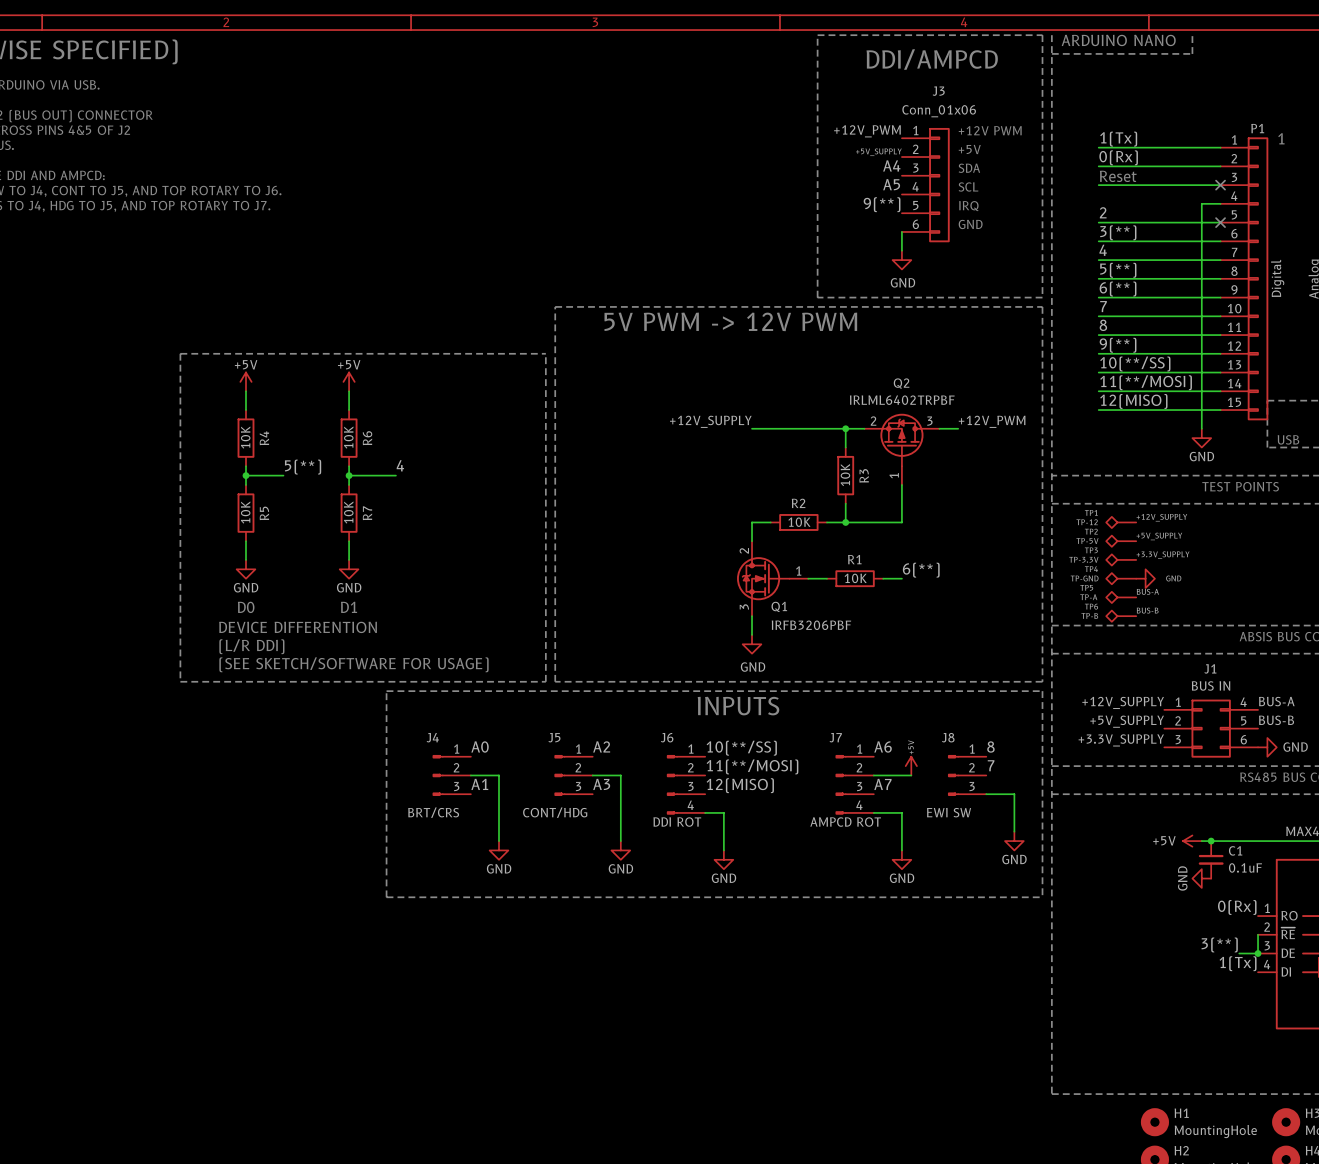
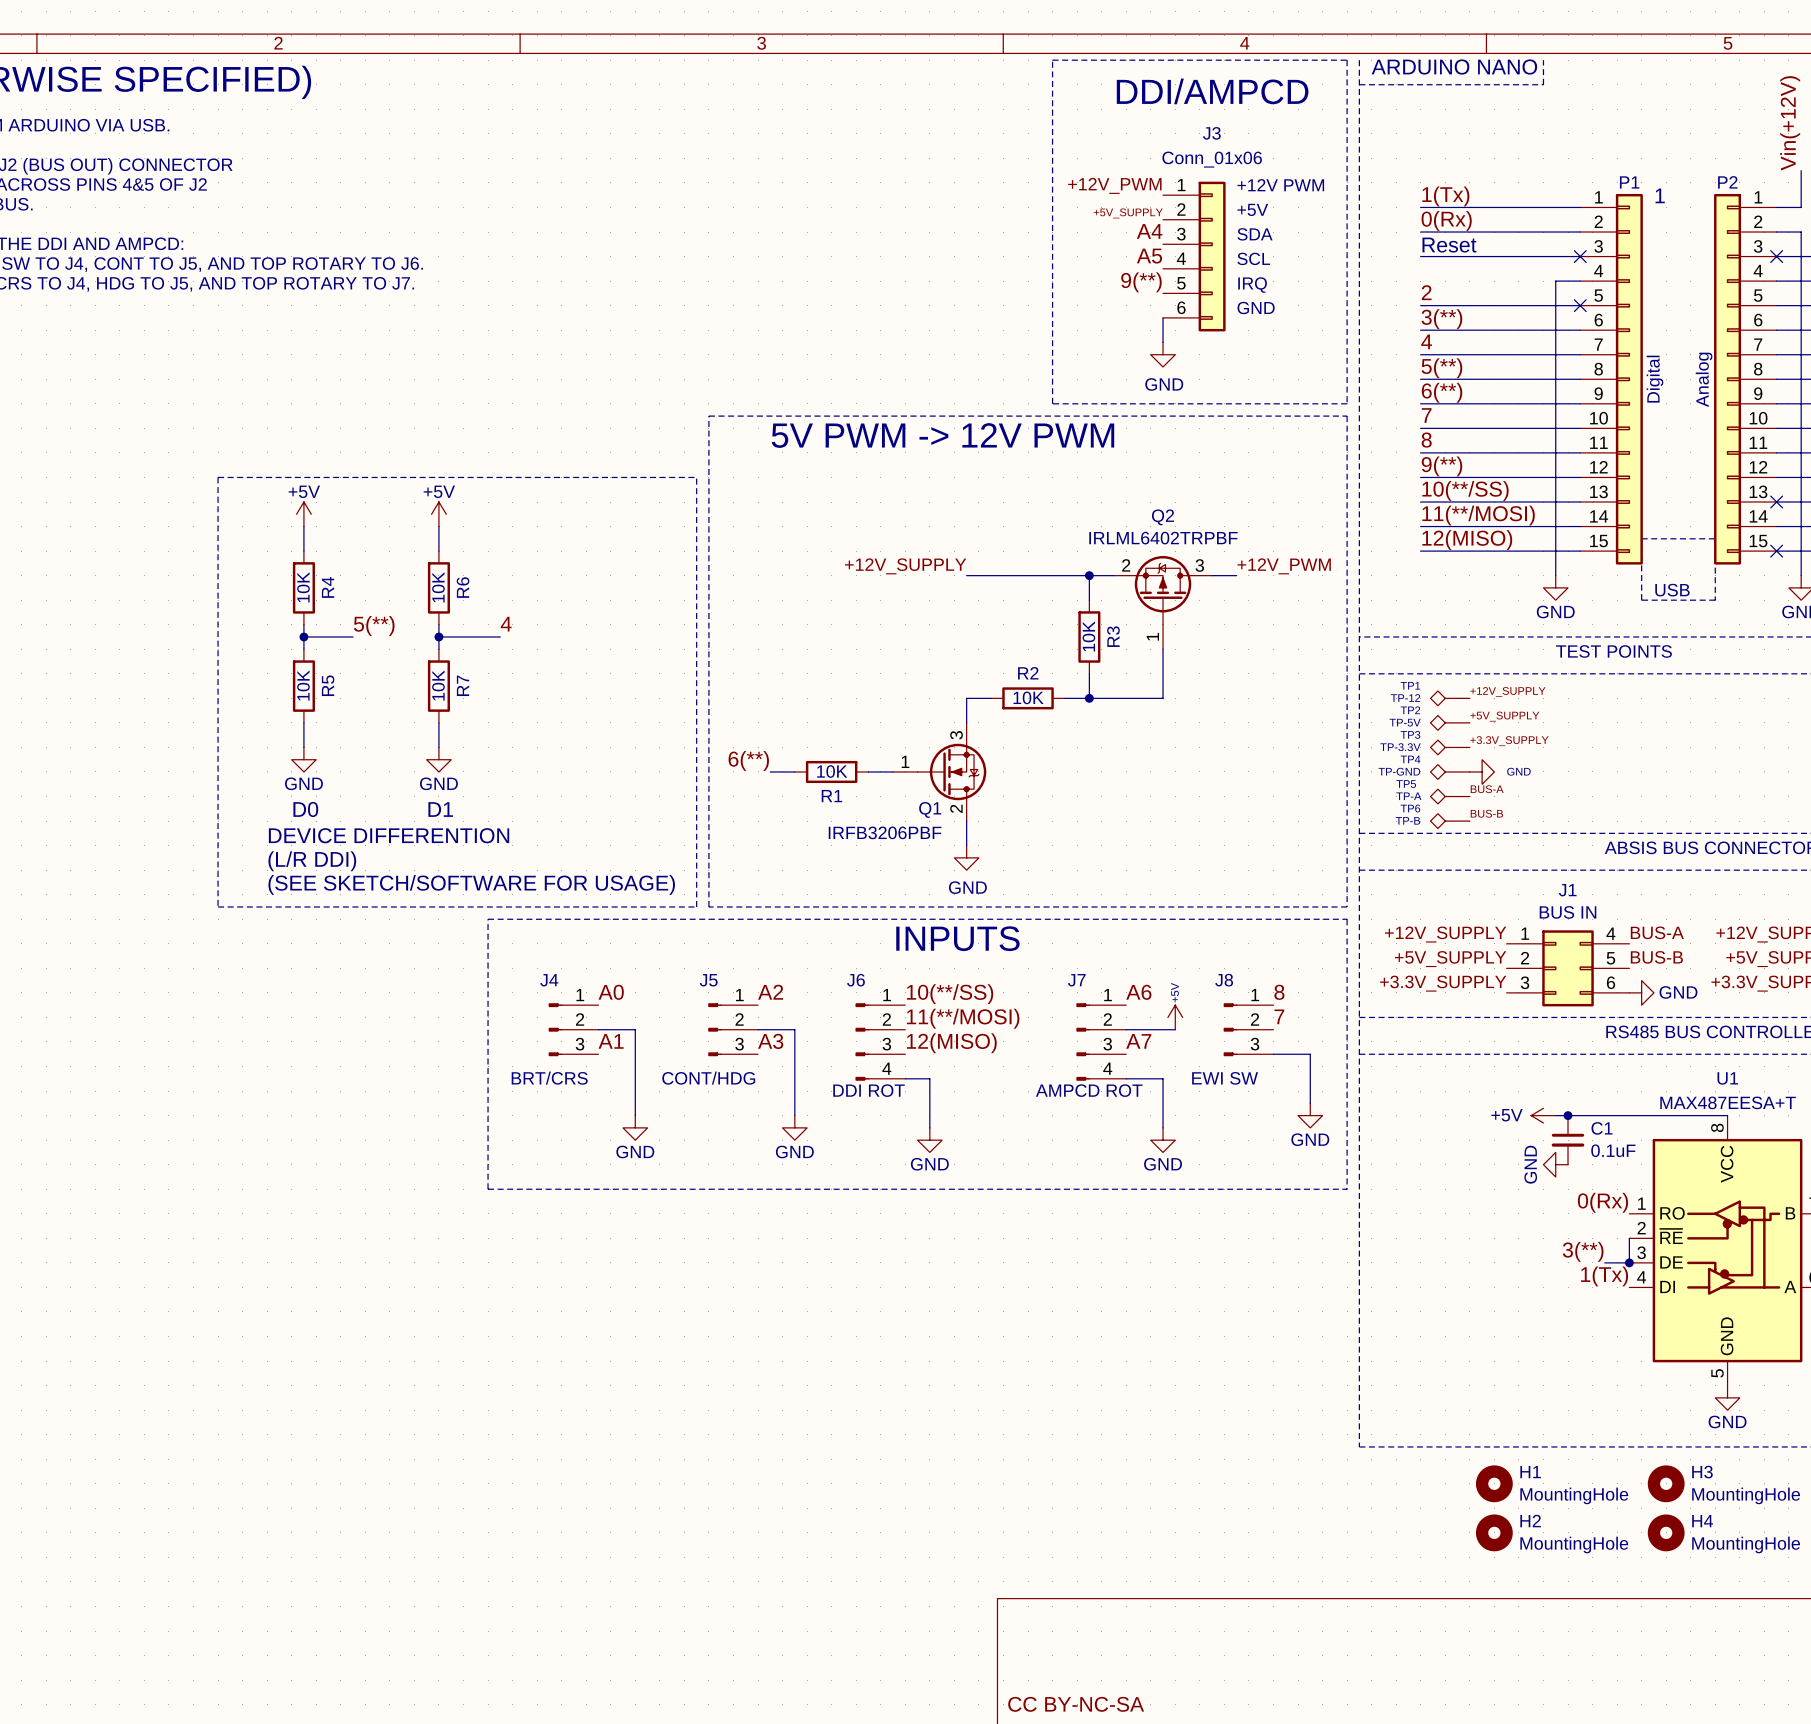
R1 name position: R1 (854, 559) -> R1 (831, 796)
label: none -> 6(**) (748, 760)
label: 6(**) (921, 570) -> none
wire: none -> (770, 771) (794, 771)
Q1 rotation: 0° (763, 578) -> 180° (951, 771)
wire: (808, 578) (826, 578) -> (868, 771) (893, 771)
R1 position: (855, 578) -> (831, 771)
wire: (883, 578) (901, 578) -> none
Q1 name position: Q1 (779, 606) -> Q1 (930, 809)
Q1 value position: IRFB3206PBF (811, 625) -> IRFB3206PBF (885, 832)

